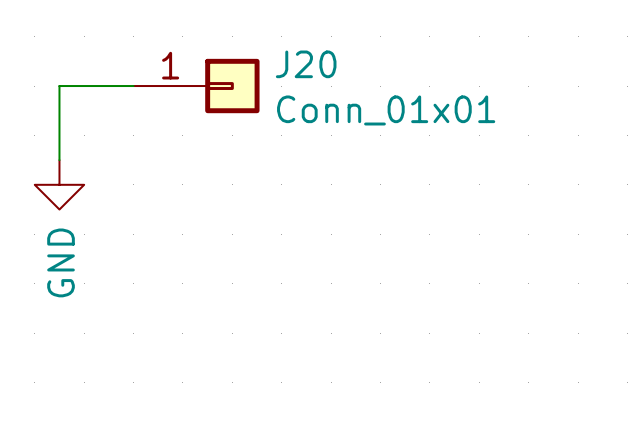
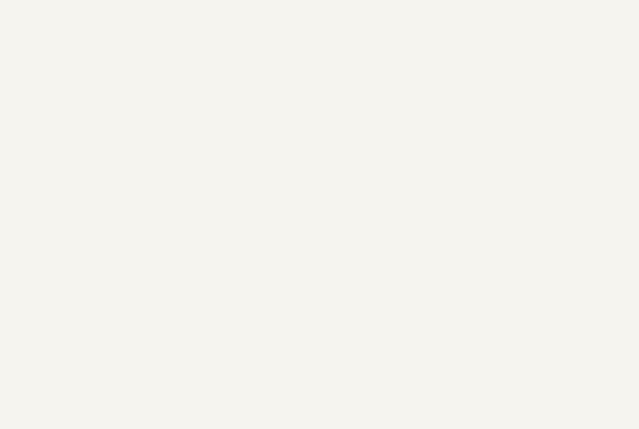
wire: (133, 86) (59, 86) (59, 160) -> none
J20: Conn_01x01 (196, 86) -> none
power symbol: GND (59, 184) -> none

